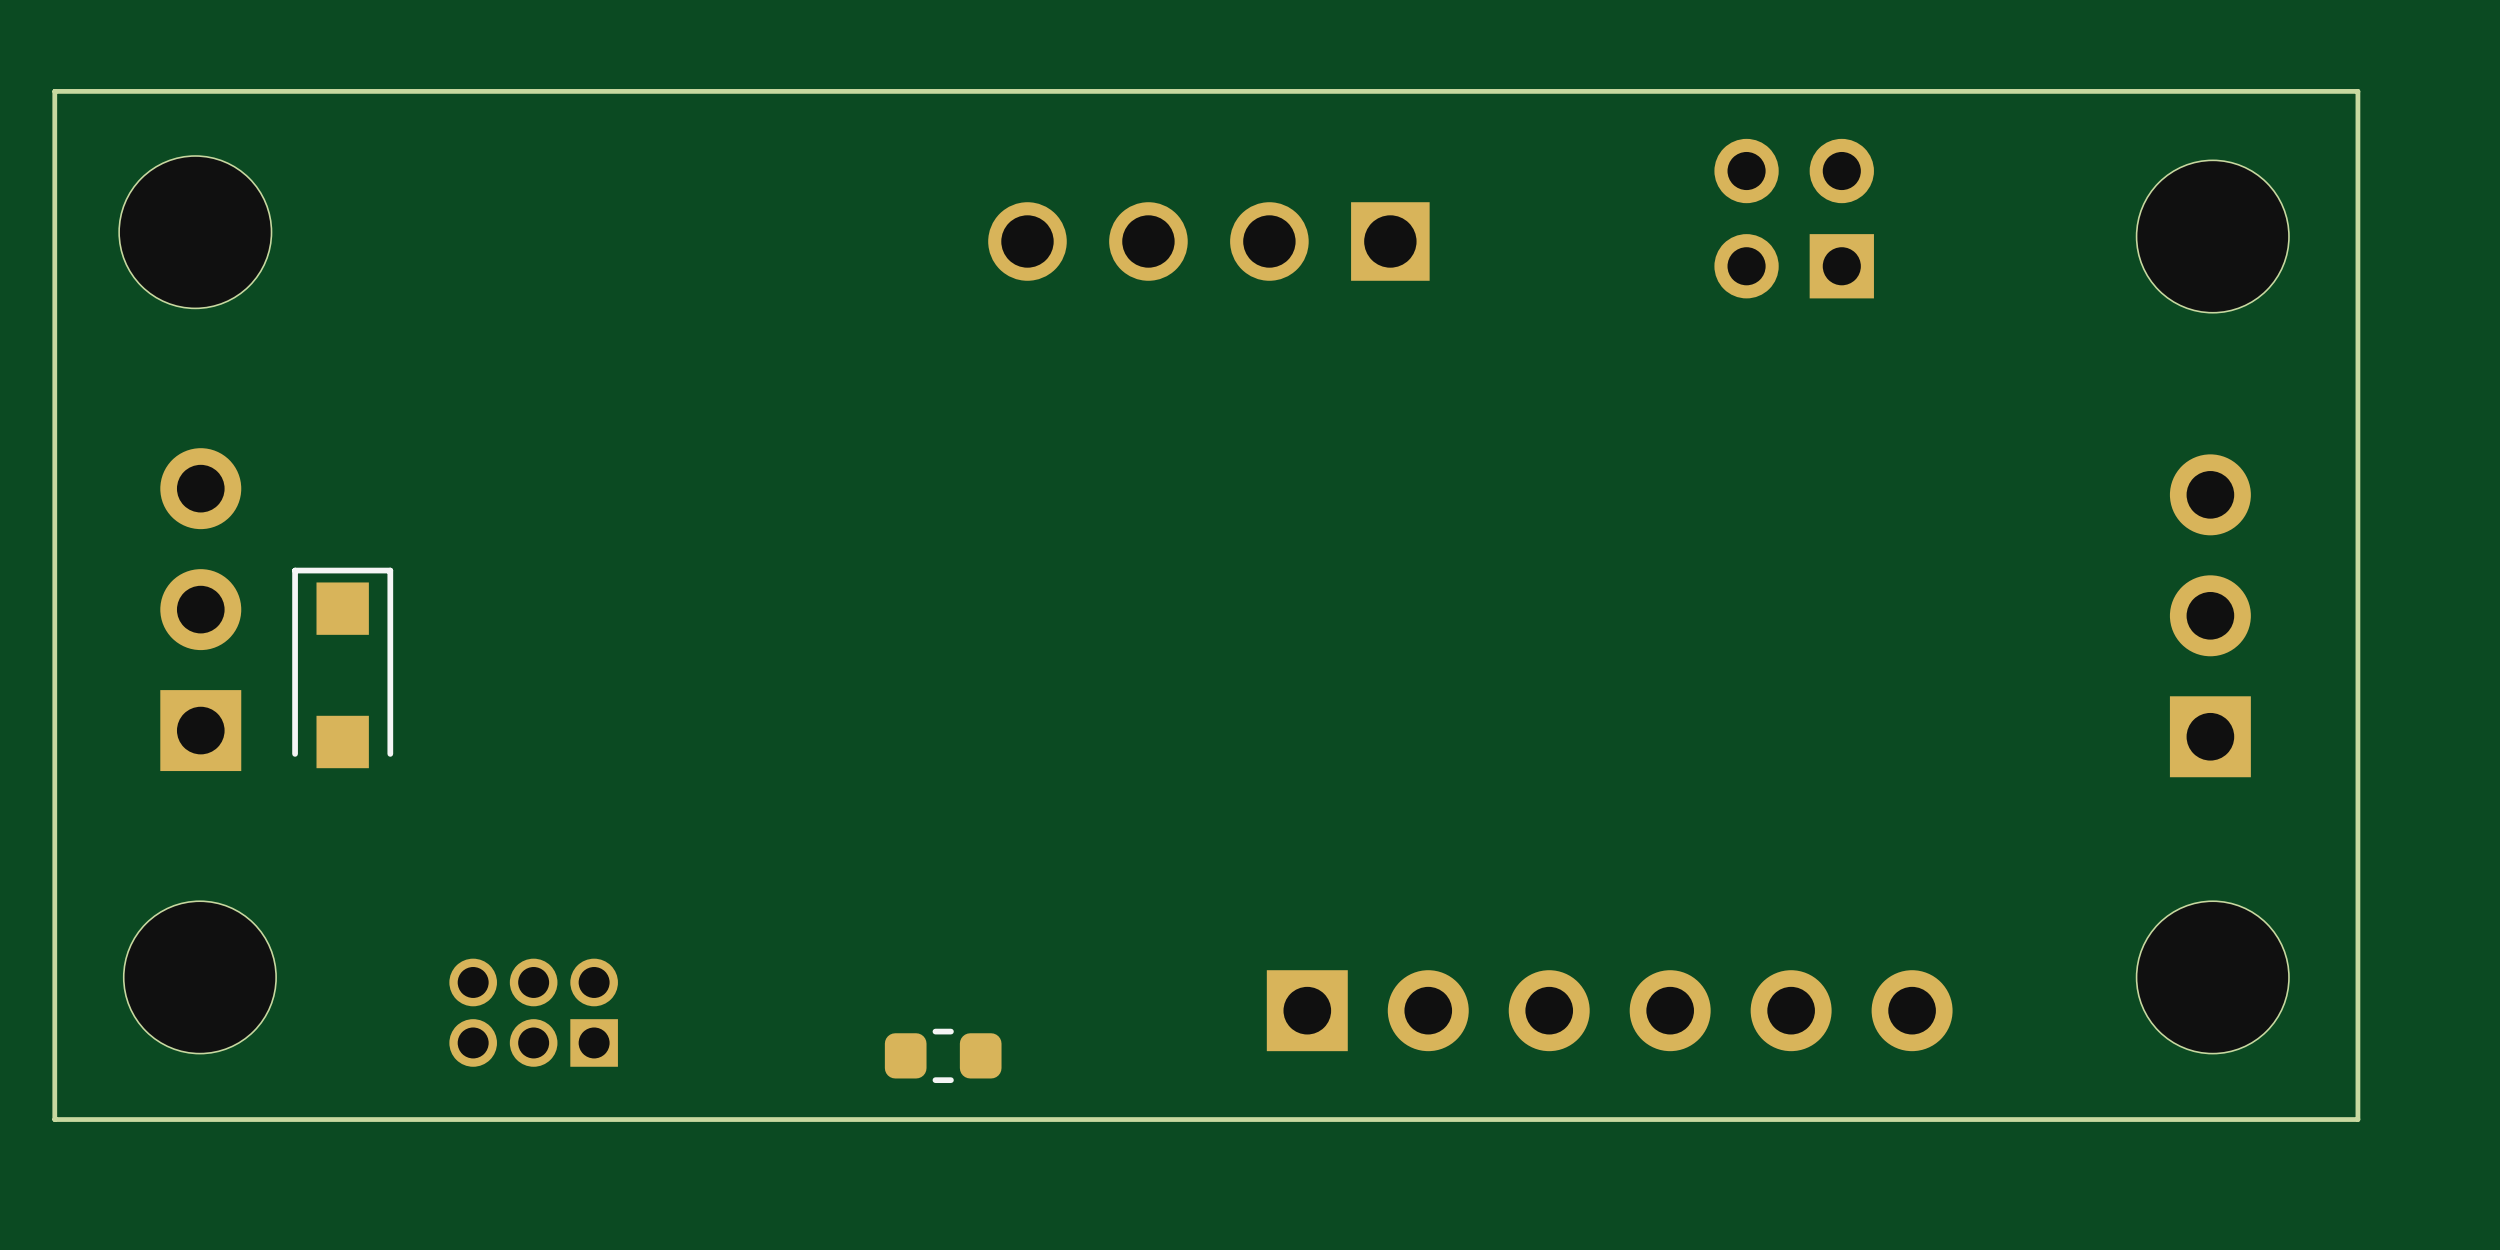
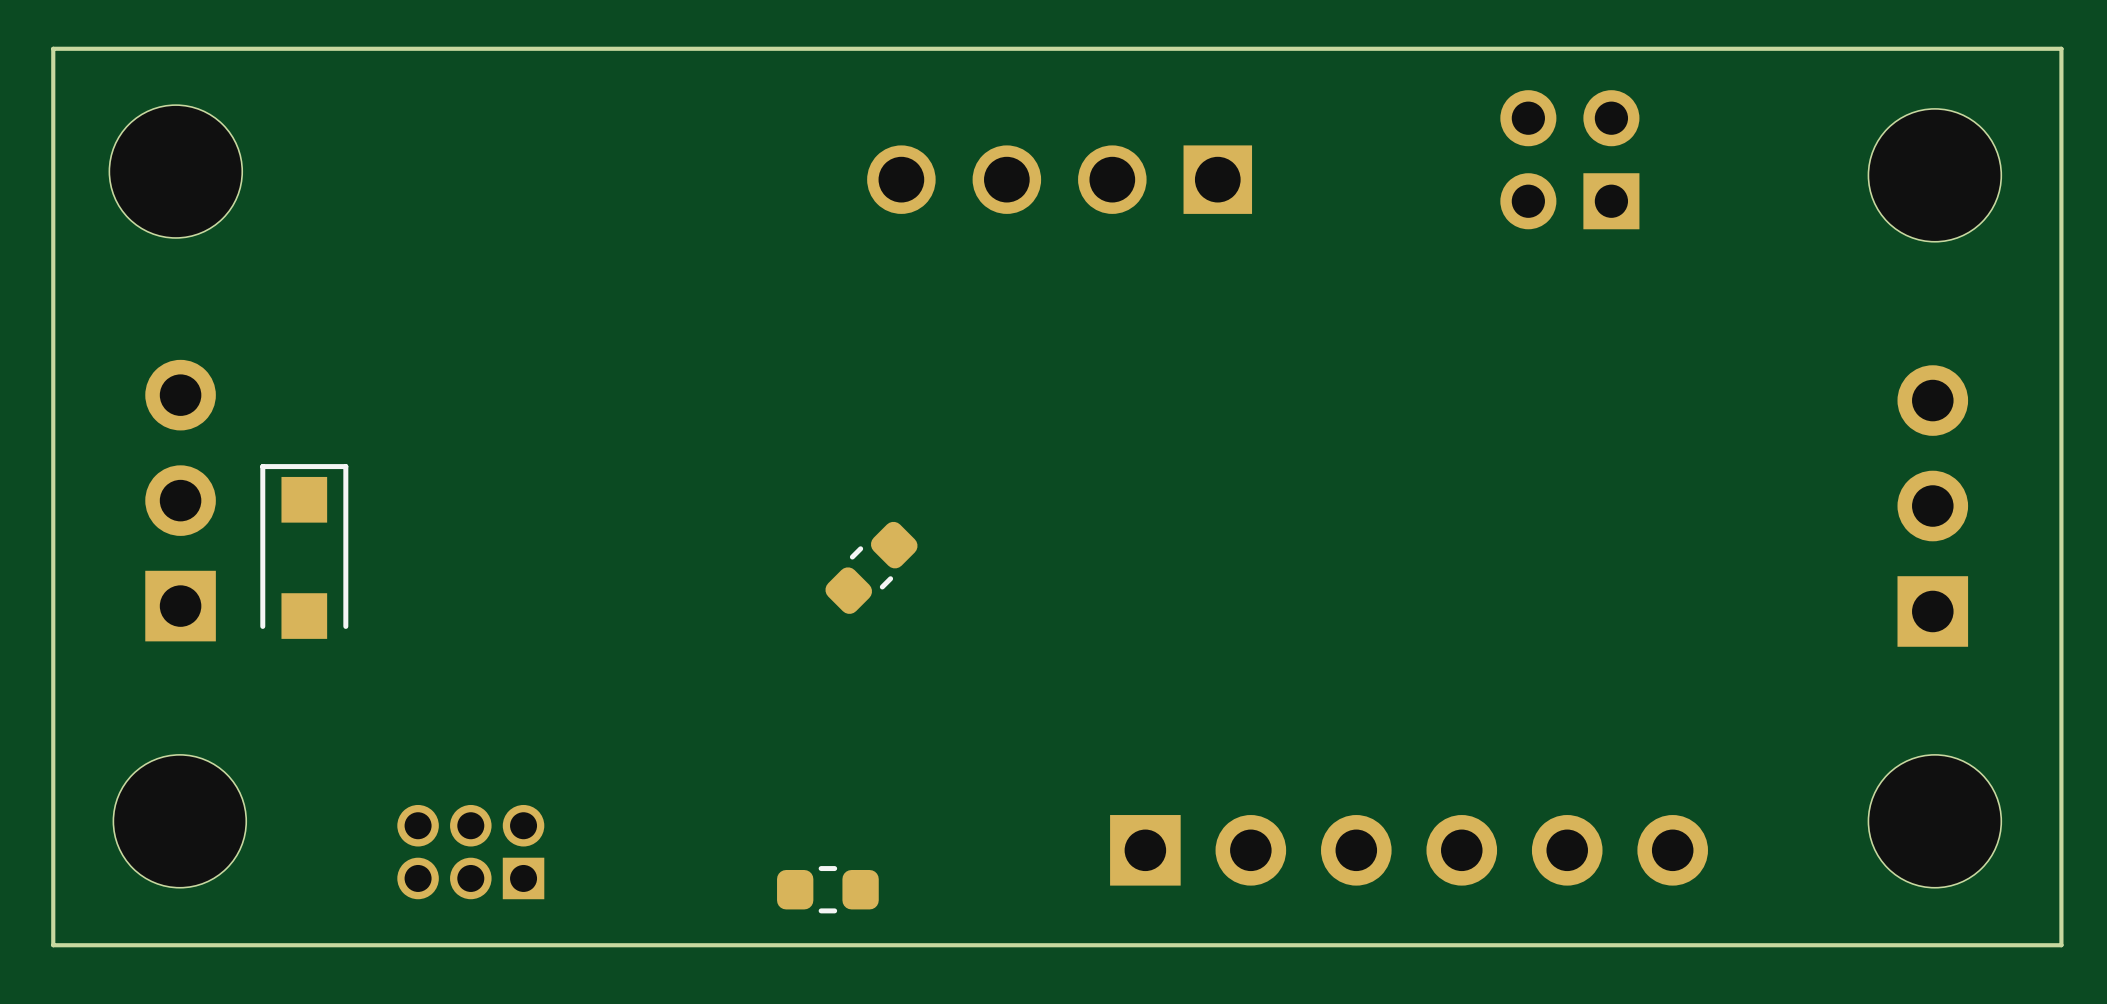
part: none -> (871, 567)

